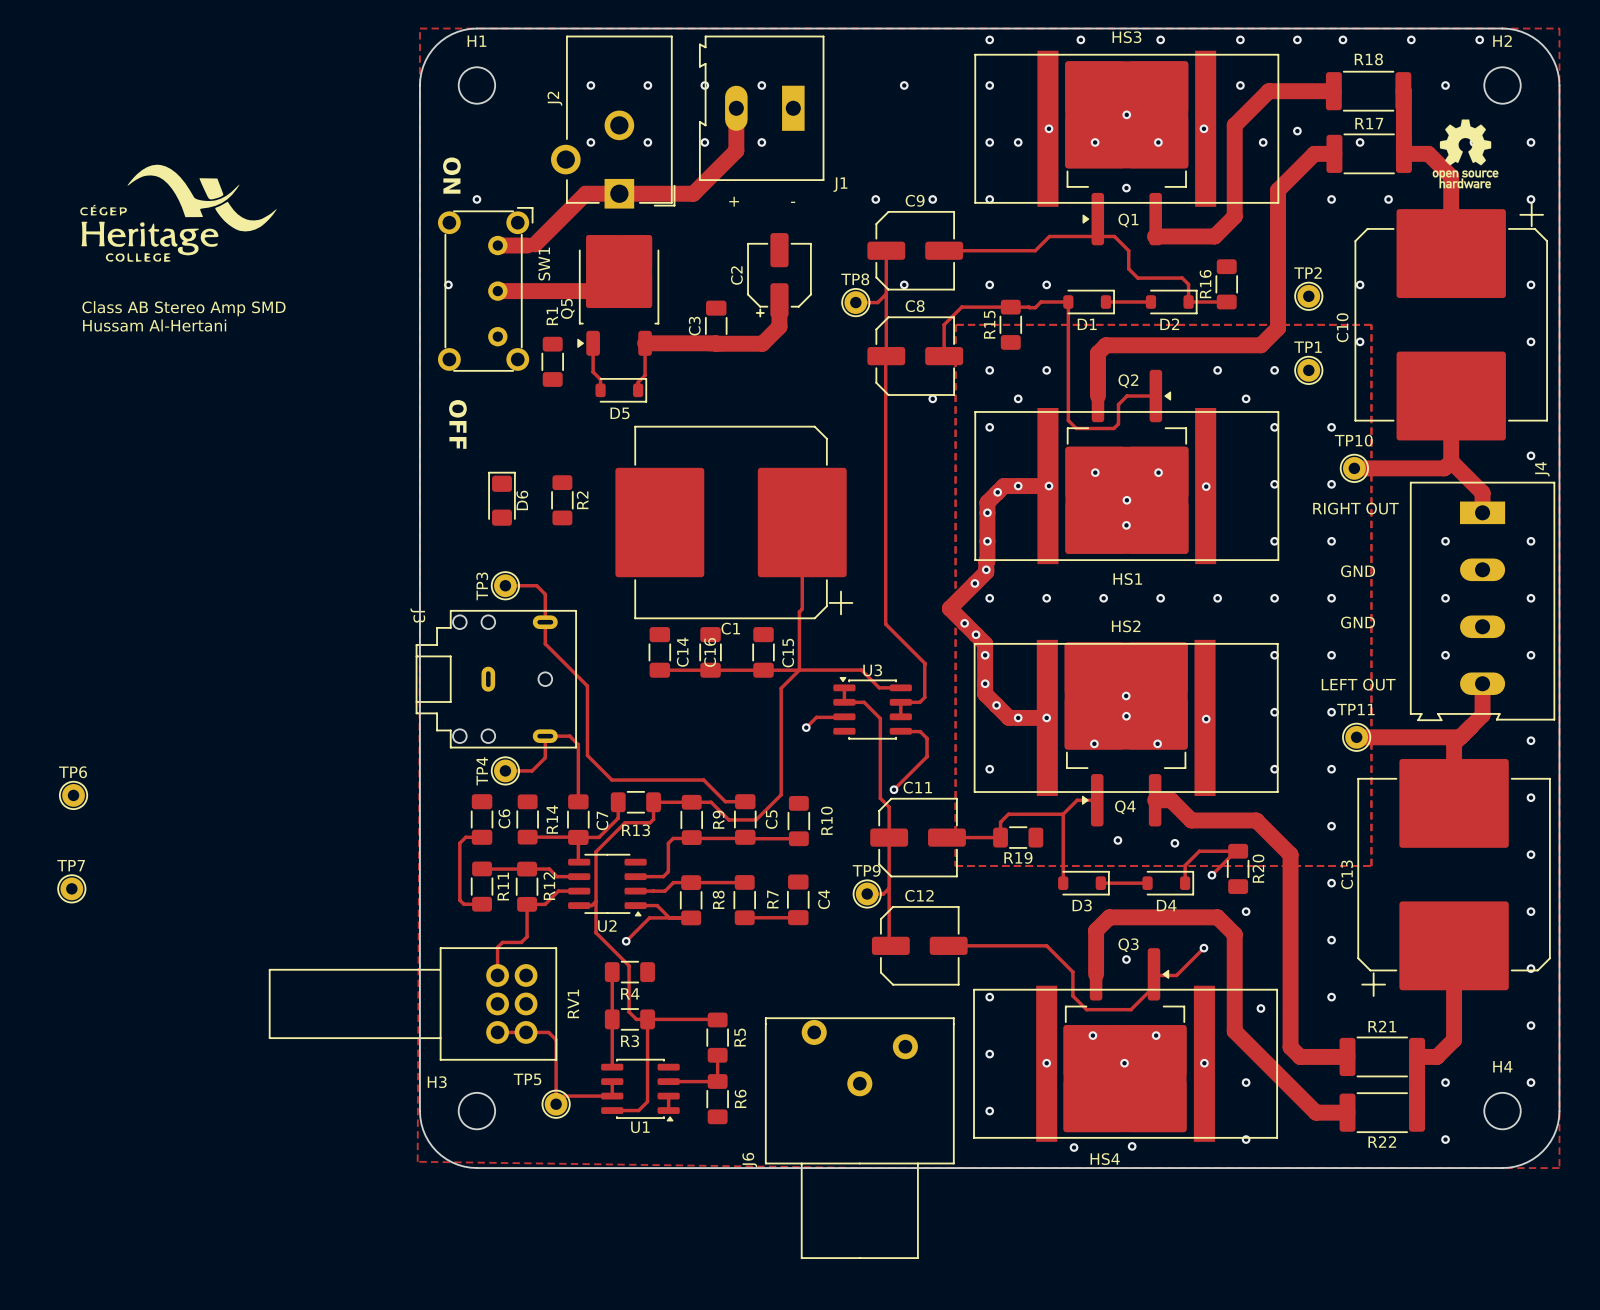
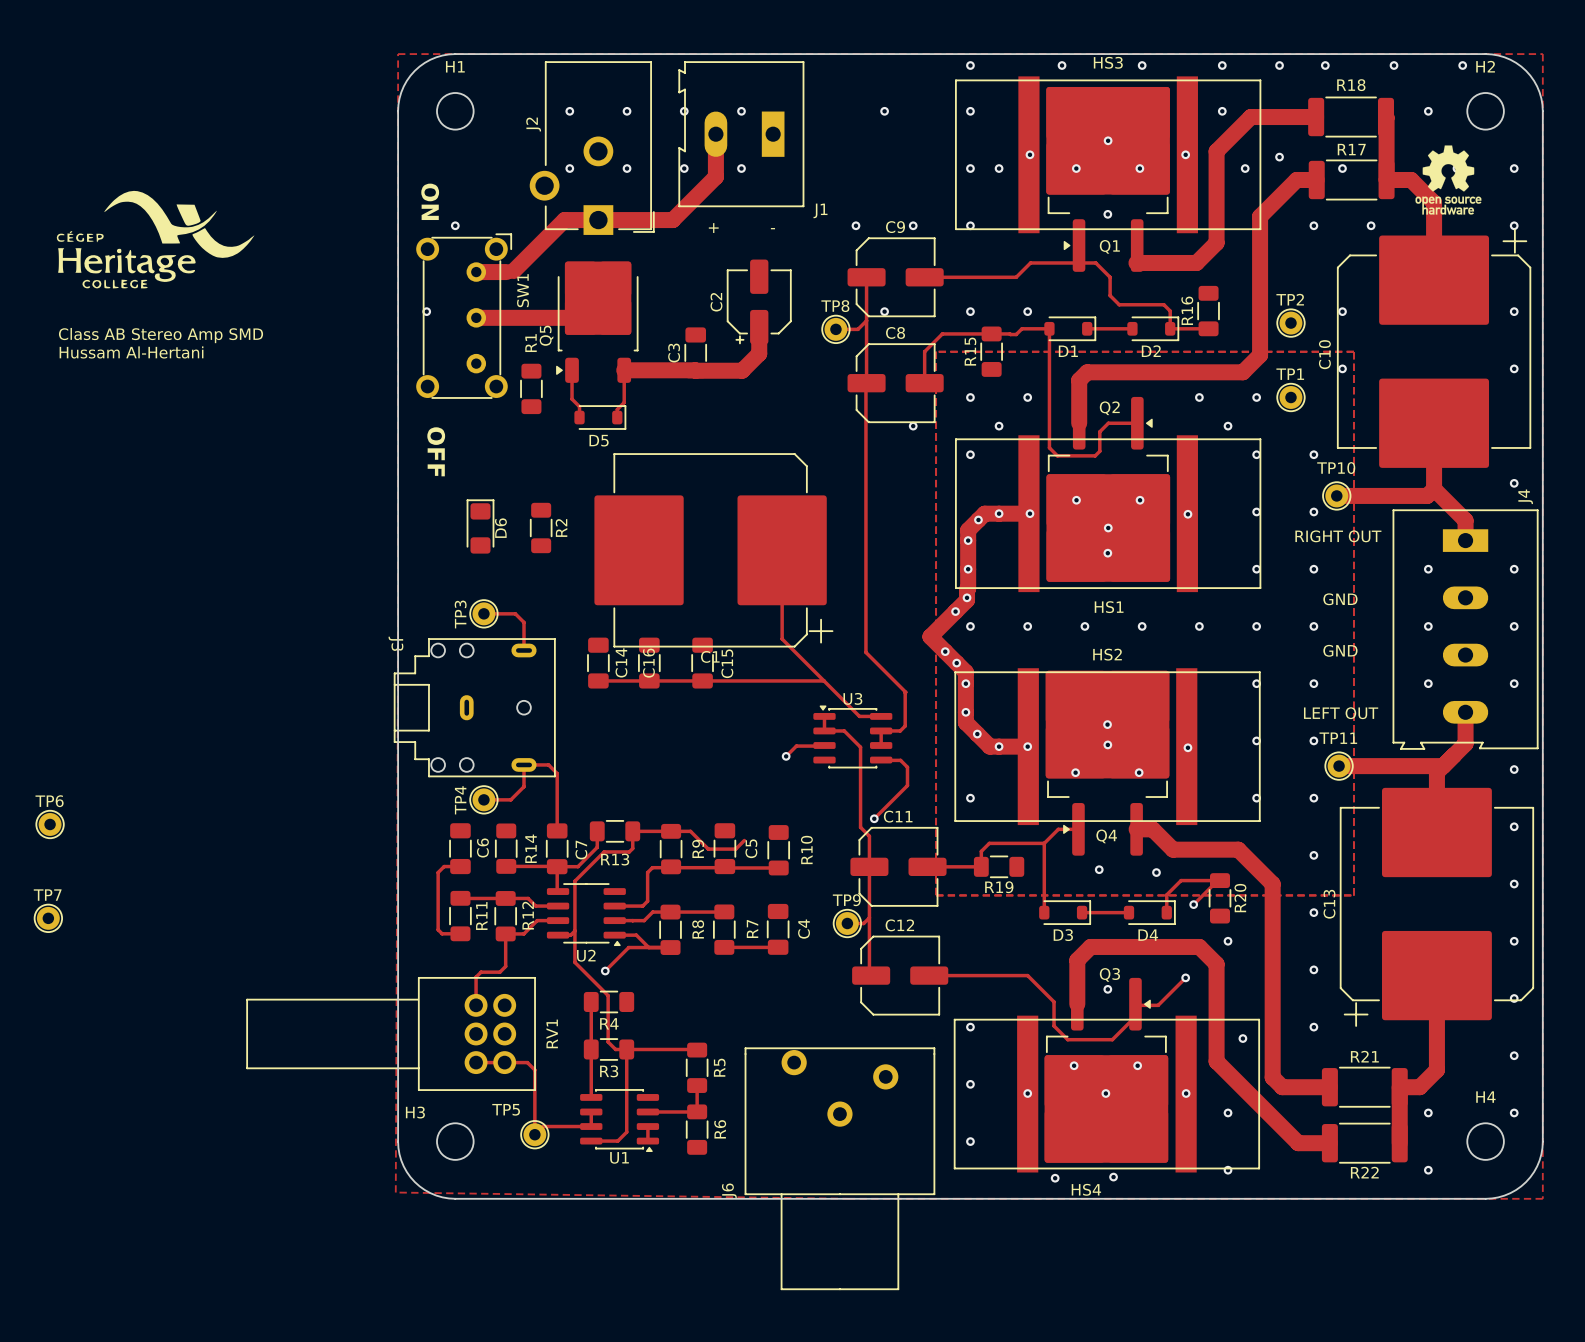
track: (802, 609) (799, 611) (799, 670) -> none
track: (545, 622) (545, 643) (587, 686) (587, 755) (611, 780) (703, 780) (725, 801) (745, 801) -> none
track: none -> (598, 680) (824, 680)
C14 position: (659, 652) -> (598, 663)
C16 position: (710, 652) -> (649, 663)
C15 position: (763, 652) -> (702, 663)
track: (659, 670) (799, 670) -> none
track: (799, 670) (861, 670) -> (782, 637) (841, 698)
track: (799, 670) (781, 688) (781, 794) (764, 811) -> none

